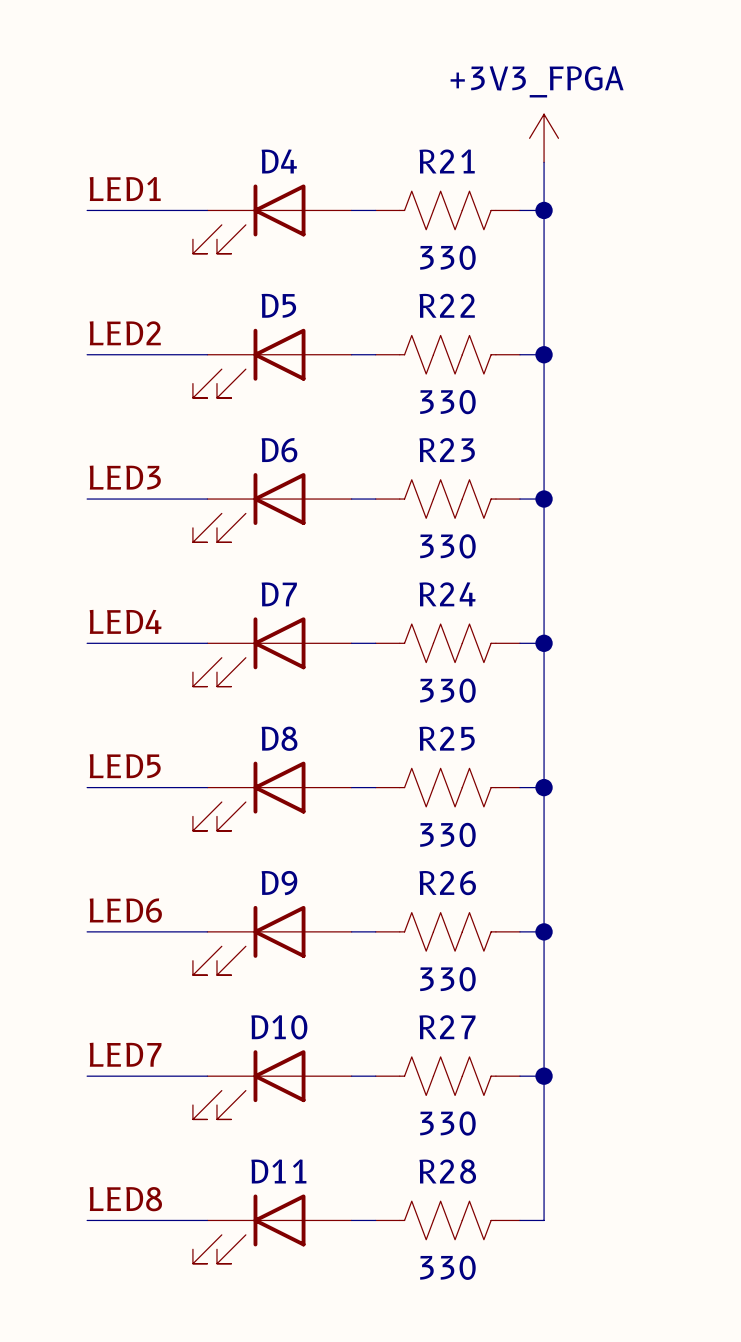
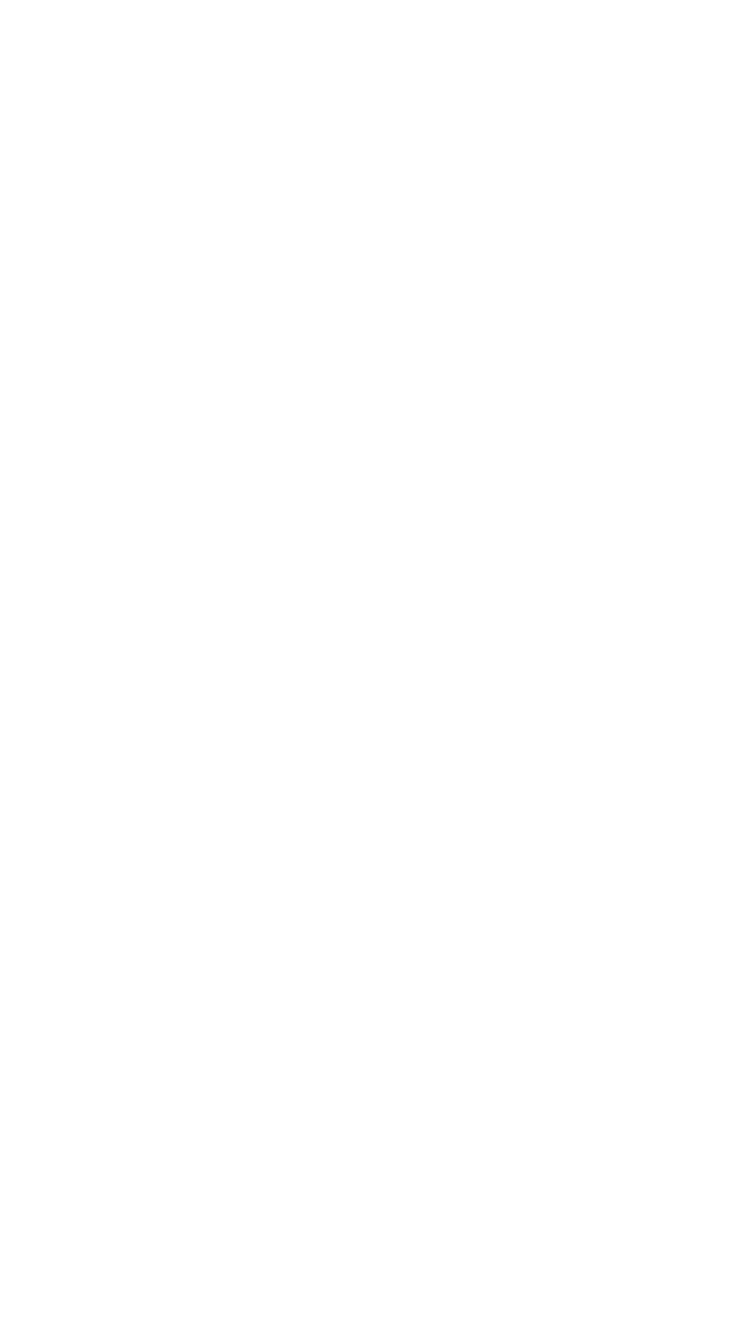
power symbol: +3V3_FPGA (544, 138) -> none
wire: (544, 162) (544, 1220) (519, 1220) -> none
label: LED1 (125, 188) -> none
wire: (87, 210) (207, 210) -> none
wire: (351, 210) (375, 210) -> none
R21: 330 (447, 210) -> none
wire: (519, 210) (544, 210) -> none
junction: (544, 210) -> none
D4: (272, 219) -> none
label: LED2 (125, 333) -> none
wire: (87, 354) (207, 354) -> none
wire: (351, 354) (375, 354) -> none
R22: 330 (447, 354) -> none
wire: (519, 354) (544, 354) -> none
junction: (544, 354) -> none
D5: (272, 363) -> none
label: LED3 (125, 477) -> none
wire: (87, 499) (207, 499) -> none
wire: (351, 499) (375, 499) -> none
R23: 330 (447, 499) -> none
wire: (519, 499) (544, 499) -> none
junction: (544, 499) -> none
D6: (272, 507) -> none
label: LED4 (125, 621) -> none
wire: (87, 643) (207, 643) -> none
wire: (351, 643) (375, 643) -> none
R24: 330 (447, 643) -> none
wire: (519, 643) (544, 643) -> none
junction: (544, 643) -> none
D7: (272, 651) -> none
label: LED5 (125, 766) -> none
wire: (87, 787) (207, 787) -> none
wire: (351, 787) (375, 787) -> none
R25: 330 (447, 787) -> none
wire: (519, 787) (544, 787) -> none
junction: (544, 787) -> none
D8: (272, 796) -> none
label: LED6 (125, 910) -> none
wire: (87, 931) (207, 931) -> none
wire: (351, 931) (375, 931) -> none
R26: 330 (447, 931) -> none
wire: (519, 931) (544, 931) -> none
junction: (544, 931) -> none
D9: (272, 940) -> none
label: LED7 (125, 1054) -> none
wire: (87, 1076) (207, 1076) -> none
wire: (351, 1076) (375, 1076) -> none
R27: 330 (447, 1076) -> none
wire: (519, 1076) (544, 1076) -> none
junction: (544, 1076) -> none
D10: (272, 1084) -> none
label: LED8 (125, 1199) -> none
wire: (87, 1220) (207, 1220) -> none
wire: (351, 1220) (375, 1220) -> none
R28: 330 (447, 1220) -> none
D11: (272, 1229) -> none

